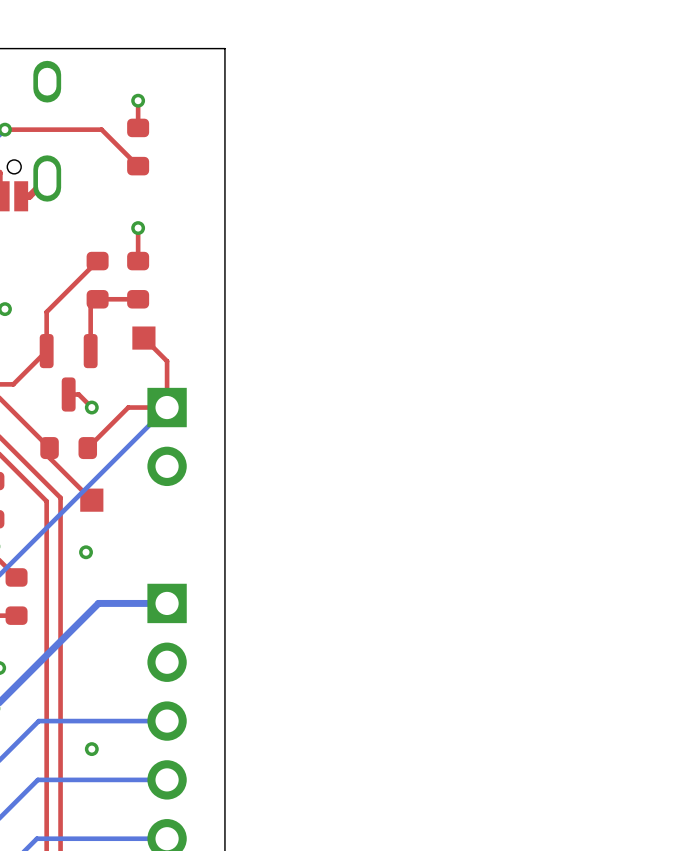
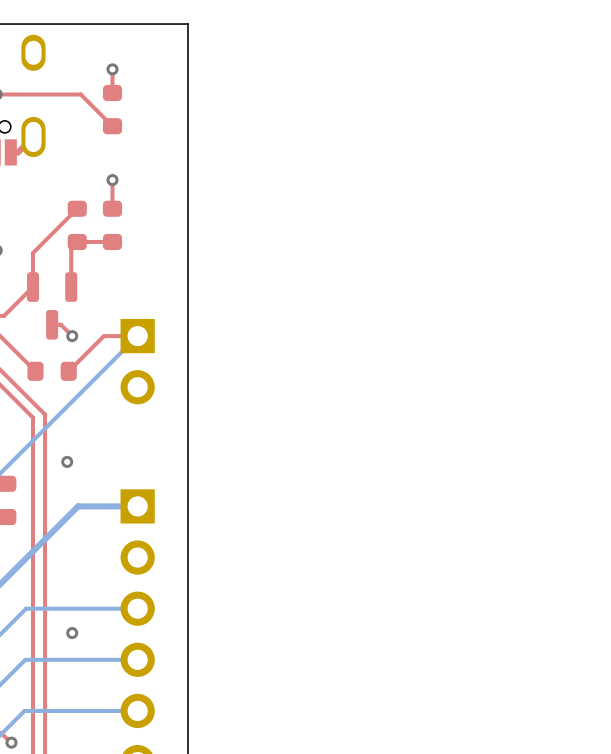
top track: (143, 338) (167, 361) (167, 407) -> none
part: (143, 338) -> none
top track: (49, 448) (49, 457) (91, 500) -> none
part: (91, 500) -> none

